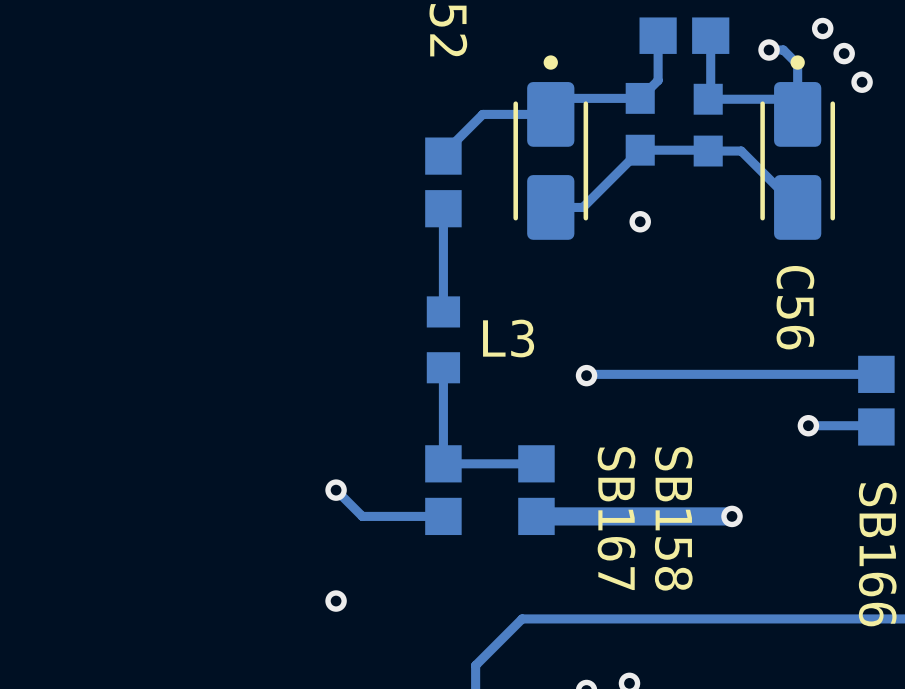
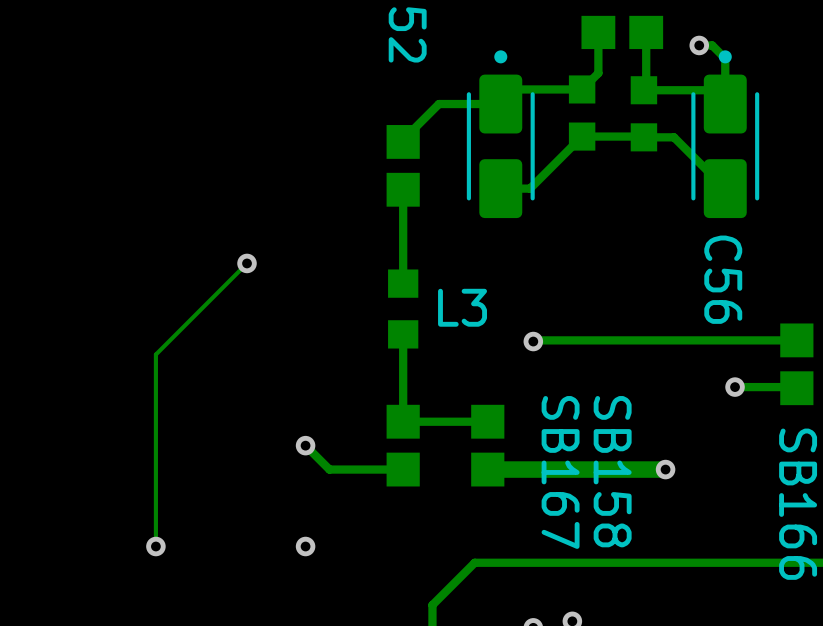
via: (822, 28) -> none
via: (844, 53) -> none
via: (862, 82) -> none
via: (640, 221) -> none
track: none -> (247, 263) (155, 354) (155, 546)
via: none -> (247, 263)
via: none -> (155, 546)

